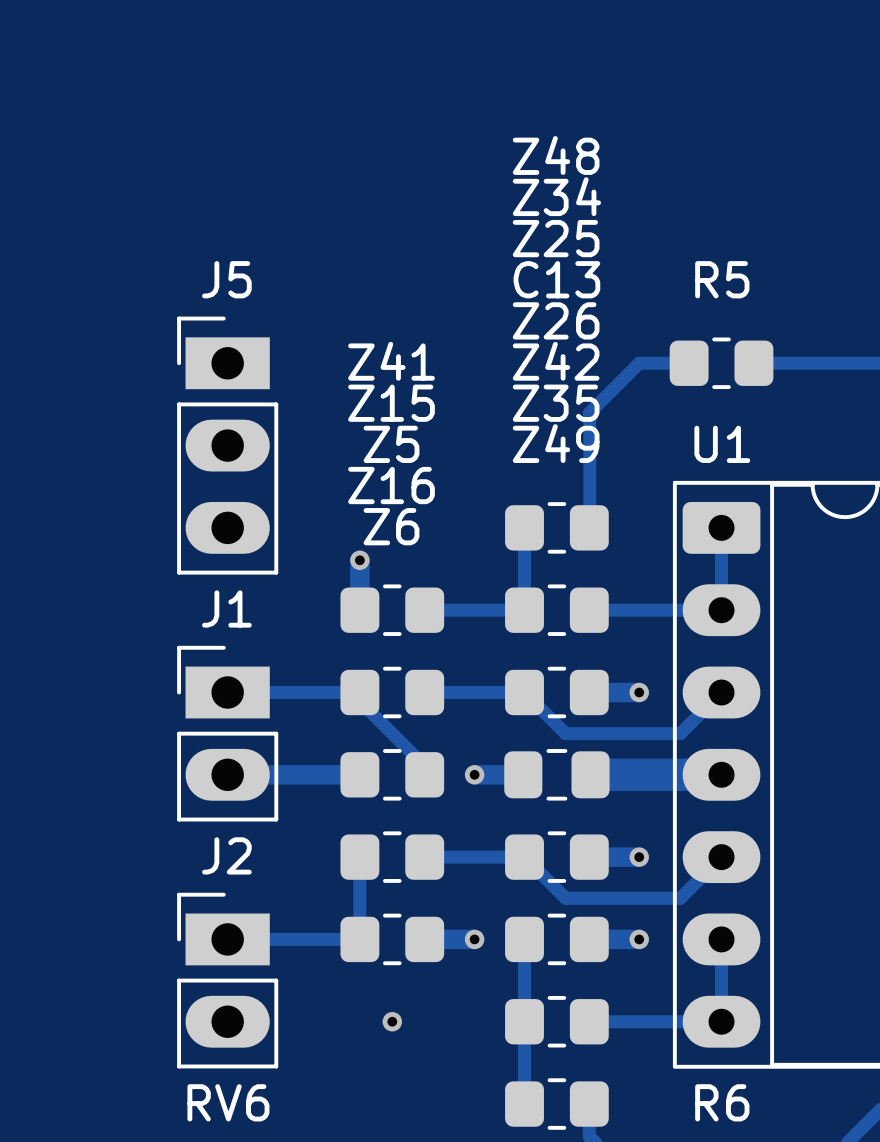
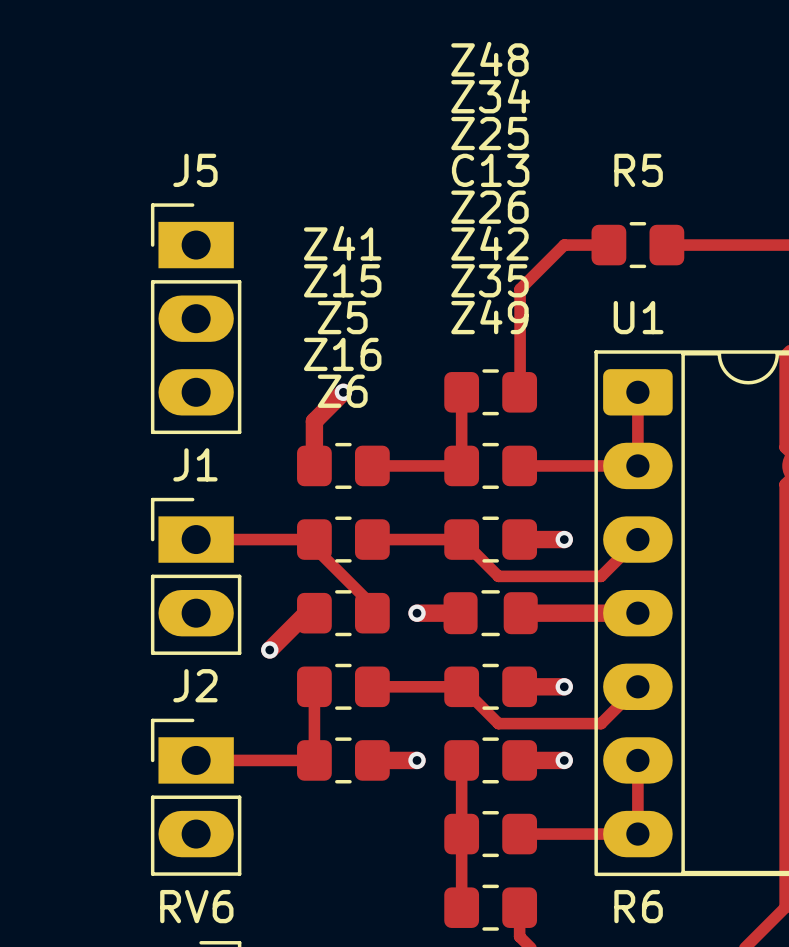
track: none -> (343, 392) (314, 421)
via position: (359, 560) -> (343, 392)
track: (227, 774) (351, 774) -> (269, 650) (306, 613)
track width: thick (590, 774) (721, 774) -> thin (520, 613) (637, 613)
via: none -> (269, 650)
via: (392, 1021) -> none

